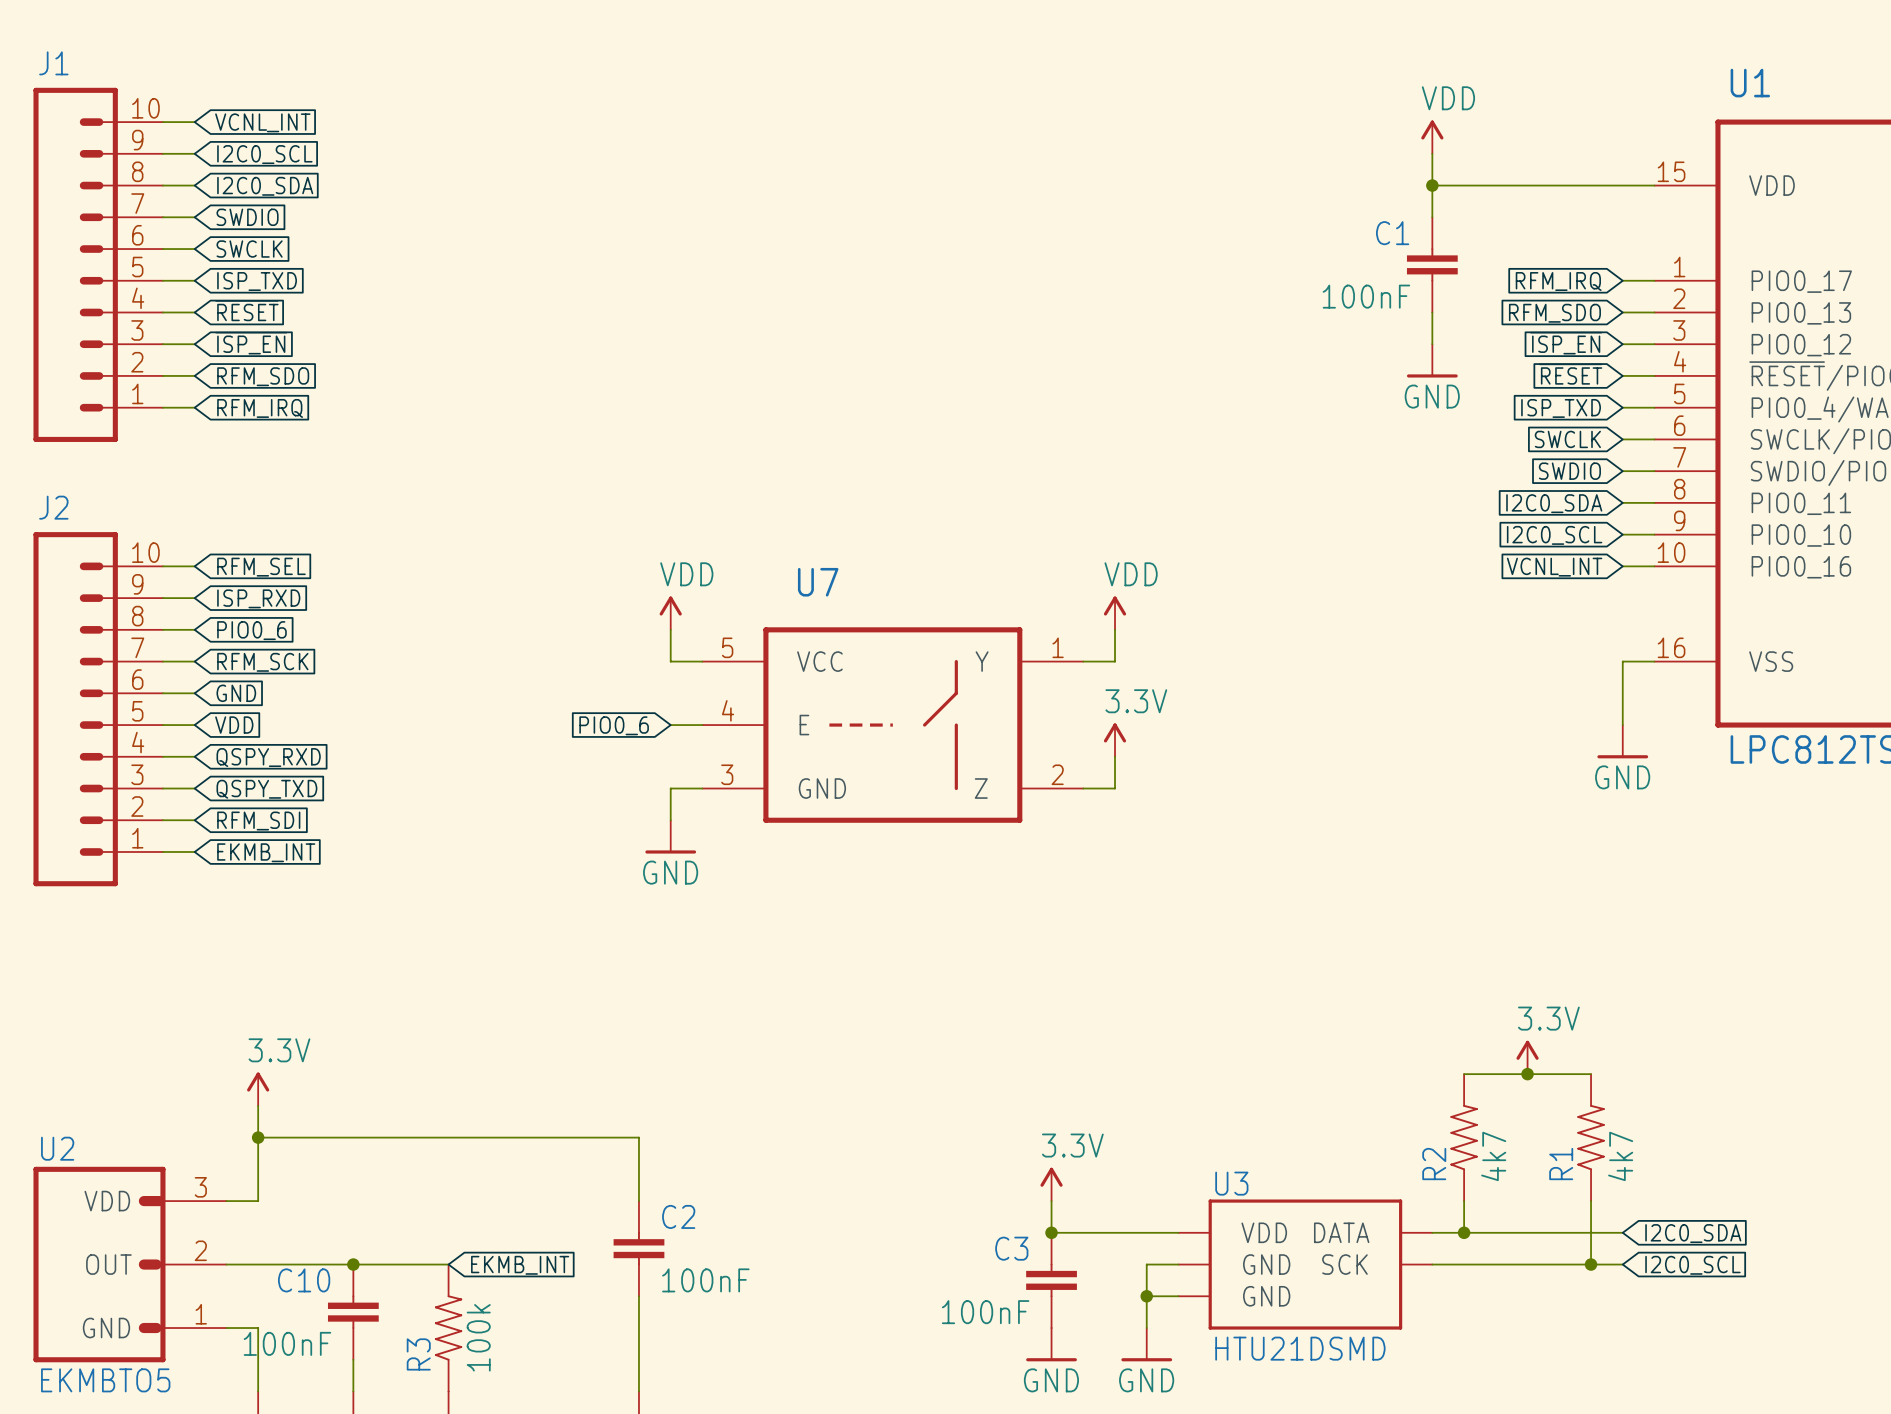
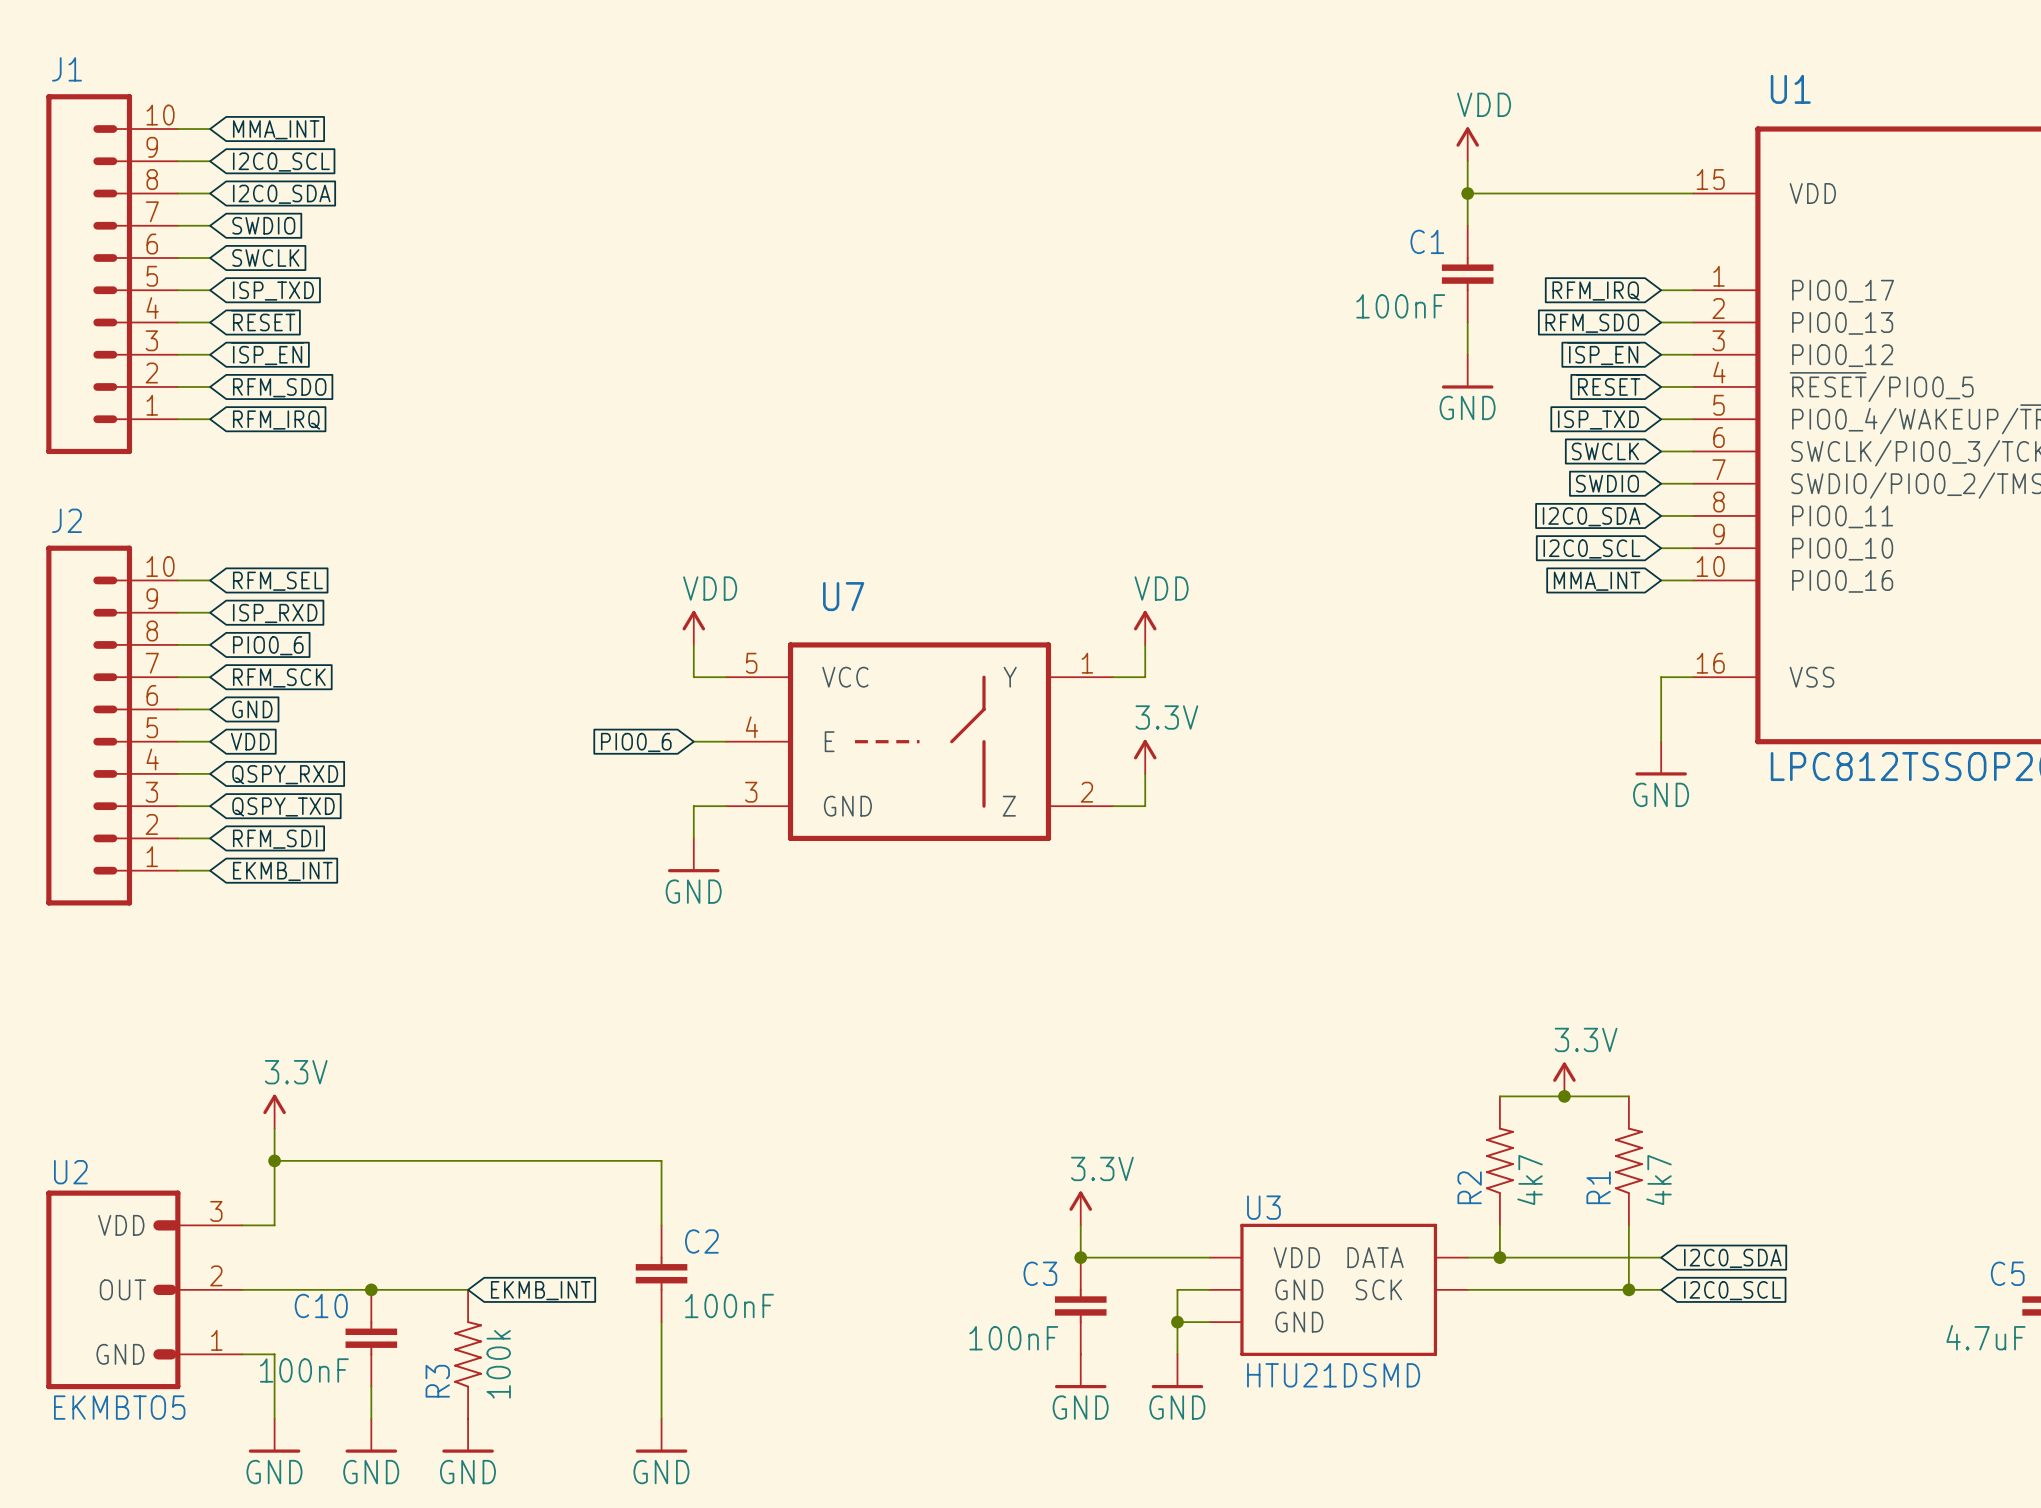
global label: VCNL_INT (262, 122) -> MMA_INT (276, 129)
global label: VCNL_INT (1554, 567) -> MMA_INT (1597, 581)

